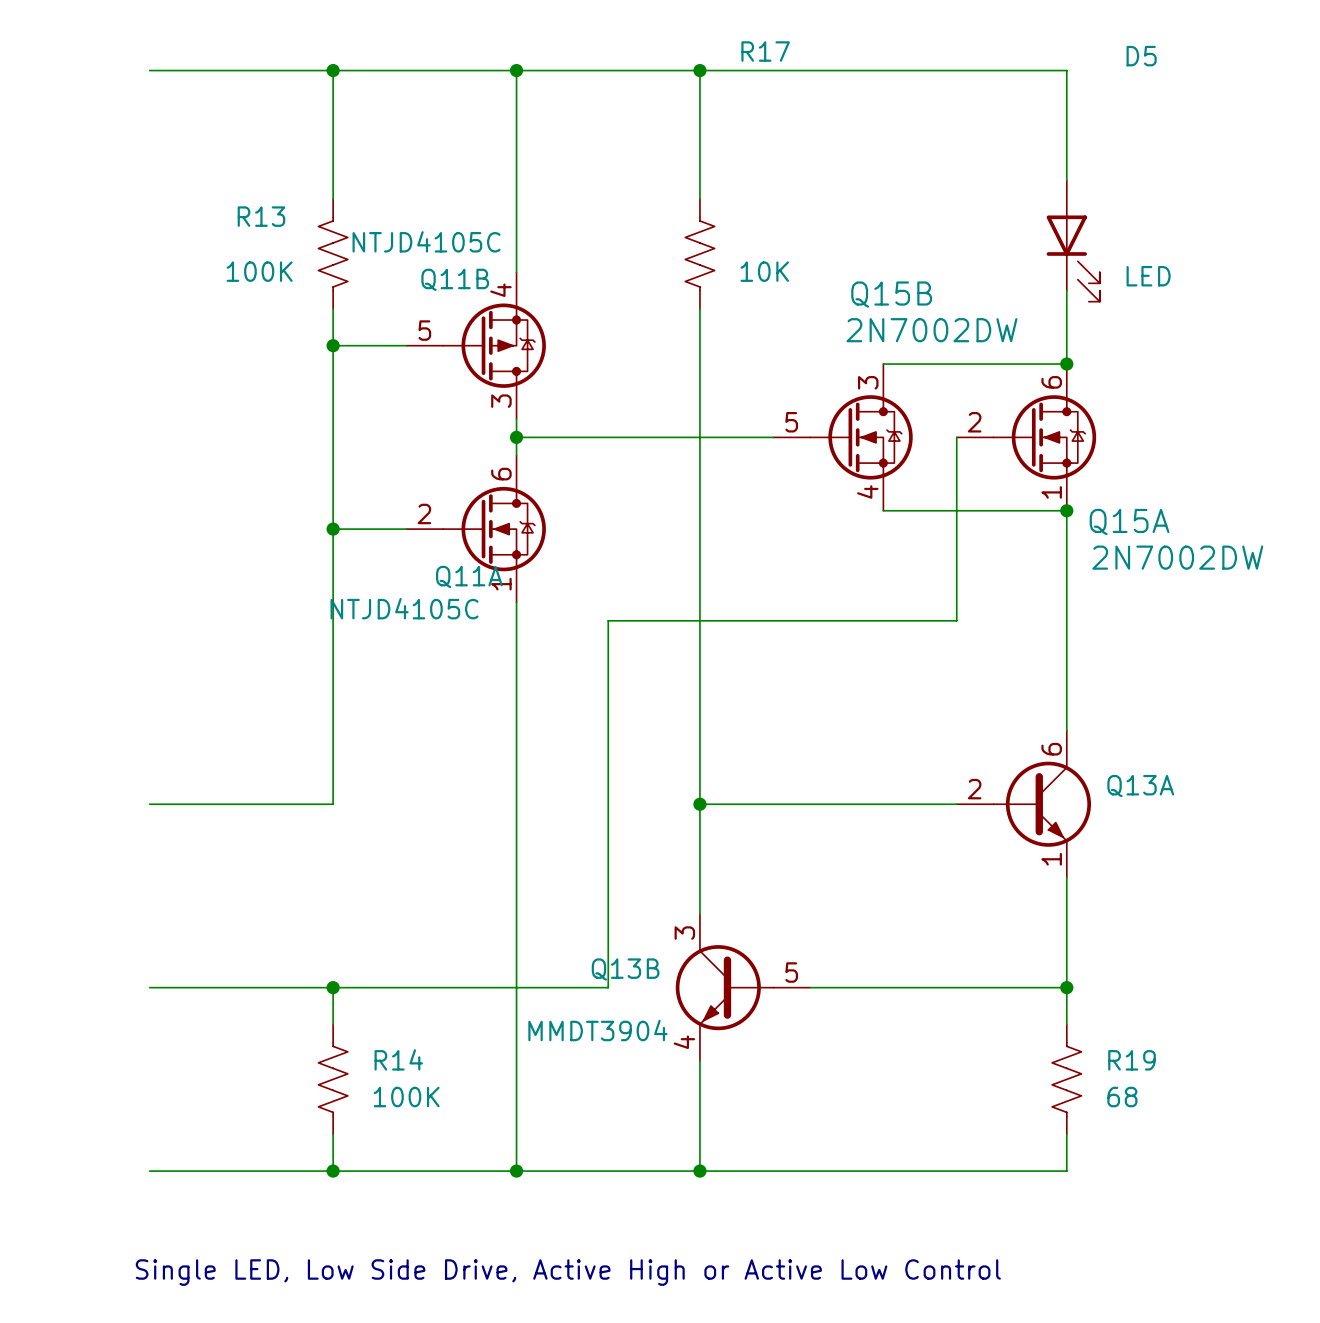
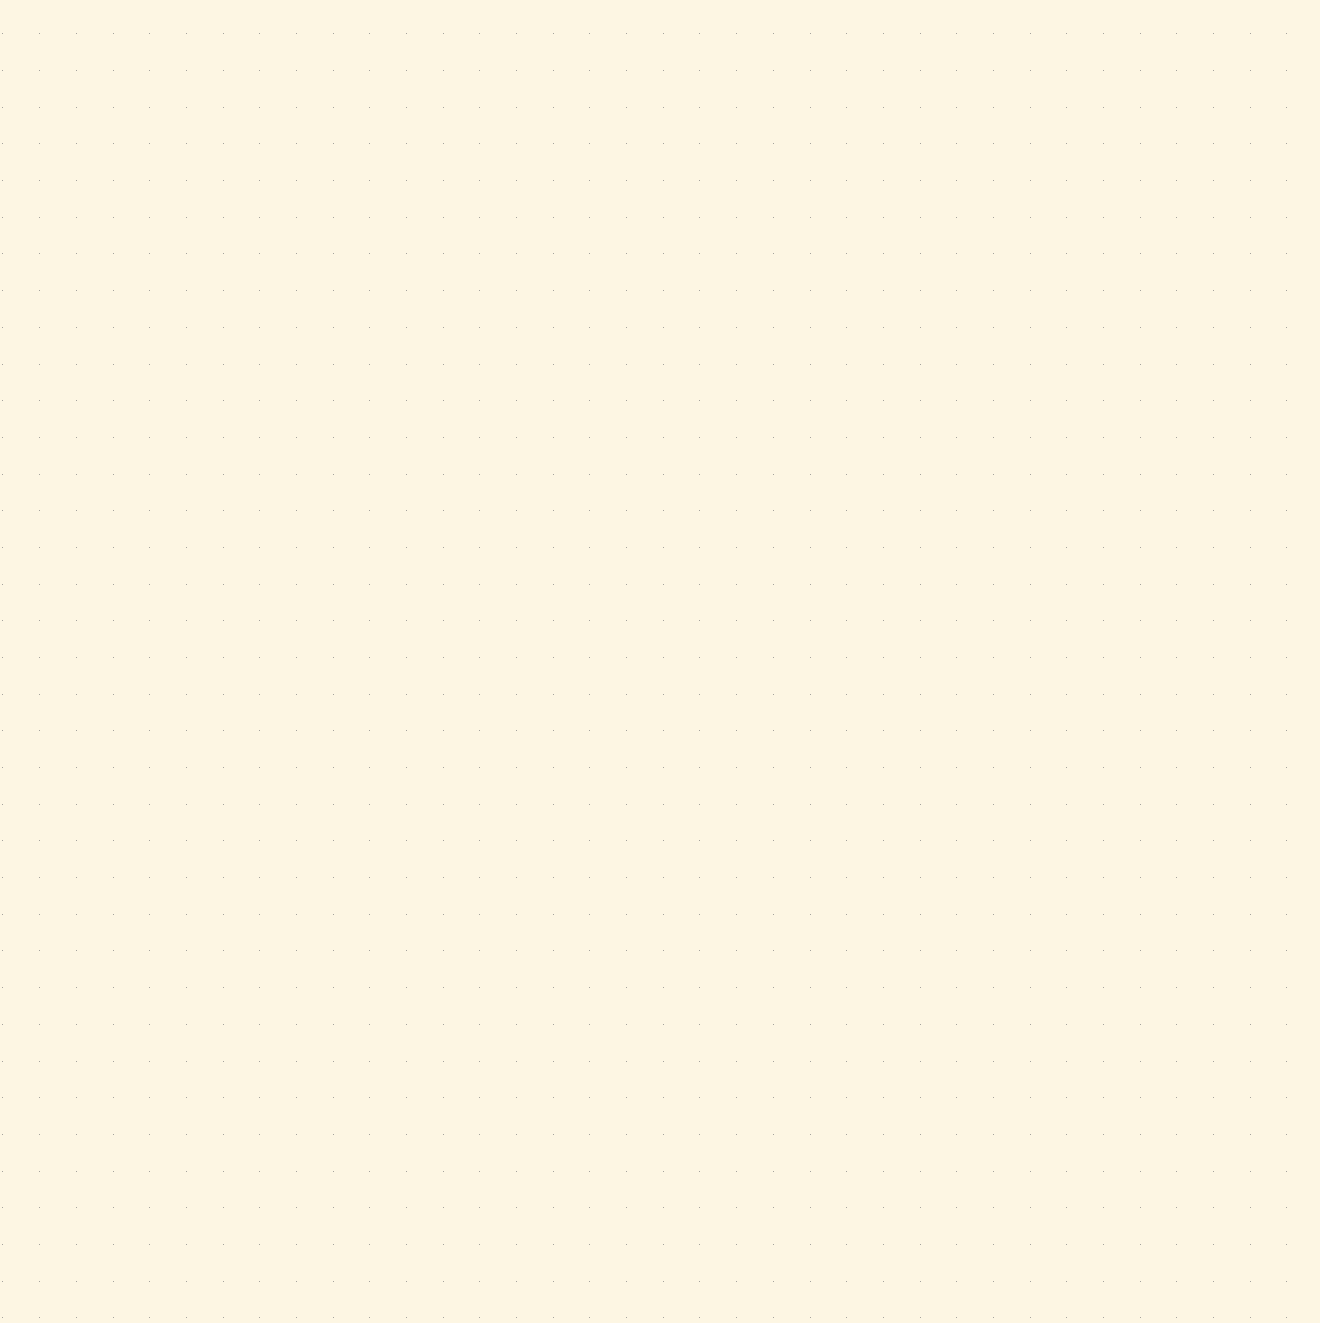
wire: (149, 70) (1066, 70) (1066, 180) -> none
wire: (333, 70) (333, 198) -> none
junction: (333, 70) -> none
wire: (516, 70) (516, 272) -> none
junction: (516, 70) -> none
wire: (699, 70) (699, 198) -> none
junction: (699, 70) -> none
D5: LED (1073, 241) -> none
R13: 100K (333, 253) -> none
R17: 10K (699, 253) -> none
wire: (1066, 290) (1066, 364) (883, 364) -> none
wire: (333, 309) (333, 804) (149, 804) -> none
wire: (699, 309) (699, 914) -> none
wire: (333, 345) (406, 345) -> none
junction: (333, 345) -> none
Q11B: NTJD4105C (476, 345) -> none
junction: (1066, 364) -> none
wire: (516, 419) (516, 455) -> none
wire: (516, 437) (773, 437) -> none
junction: (516, 437) -> none
Q15B: 2N7002DW (843, 437) -> none
wire: (956, 437) (956, 620) (608, 620) (608, 987) (149, 987) -> none
Q15A: 2N7002DW (1026, 437) -> none
wire: (883, 510) (1066, 510) (1066, 730) -> none
junction: (1066, 510) -> none
wire: (333, 529) (406, 529) -> none
junction: (333, 529) -> none
Q11A: NTJD4105C (476, 529) -> none
wire: (516, 602) (516, 1171) -> none
wire: (699, 804) (956, 804) -> none
junction: (699, 804) -> none
Q13A: (1023, 804) -> none
wire: (1066, 877) (1066, 1024) -> none
wire: (333, 987) (333, 1024) -> none
junction: (333, 987) -> none
Q13B: MMDT3904 (742, 987) -> none
wire: (810, 987) (1066, 987) -> none
junction: (1066, 987) -> none
wire: (699, 1061) (699, 1171) -> none
R14: 100K (333, 1079) -> none
R19: 68 (1066, 1079) -> none
wire: (333, 1134) (333, 1171) -> none
wire: (1066, 1134) (1066, 1171) (149, 1171) -> none
junction: (333, 1171) -> none
junction: (516, 1171) -> none
junction: (699, 1171) -> none
text: Single LED, Low Side Drive, Active High or Active Low Control (568, 1272) -> none

